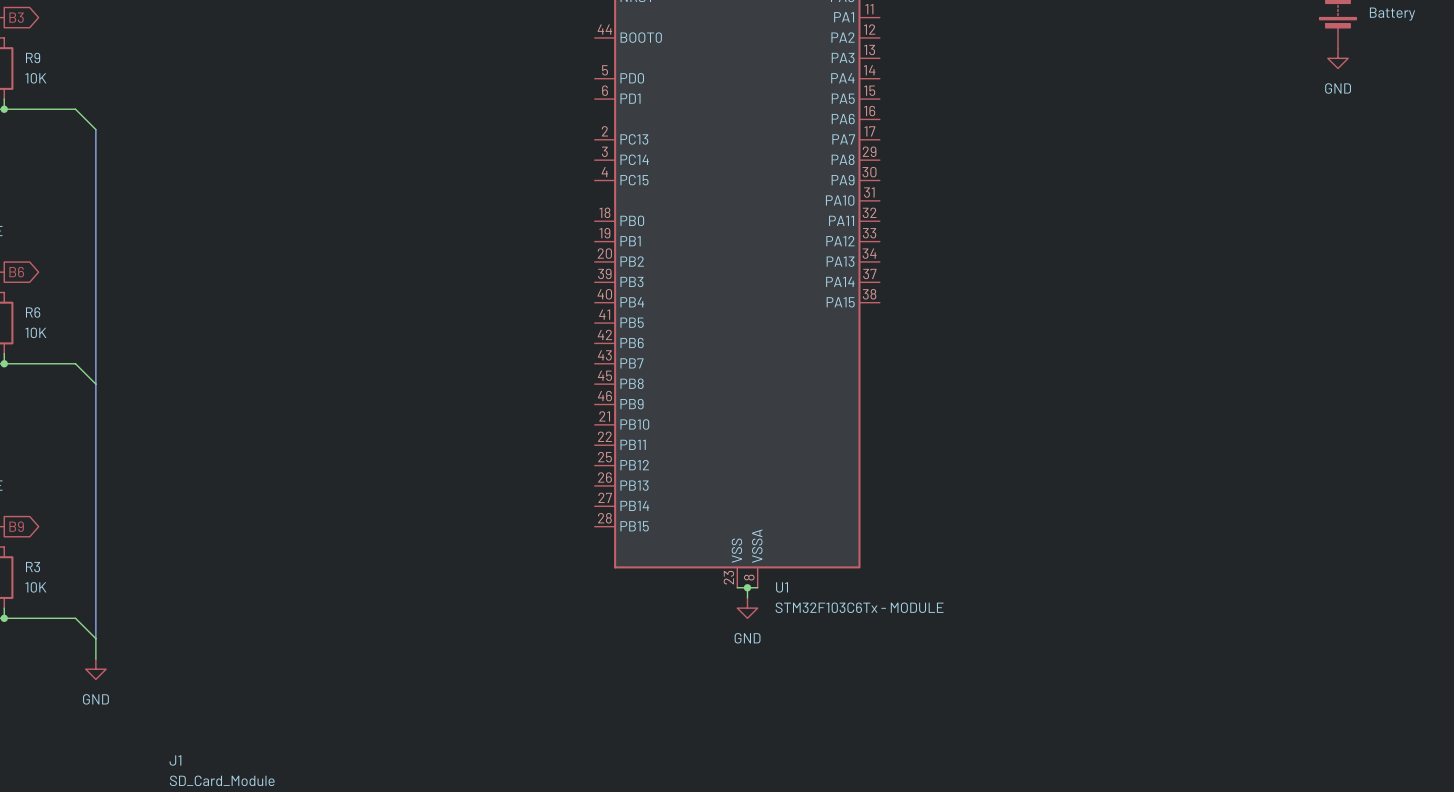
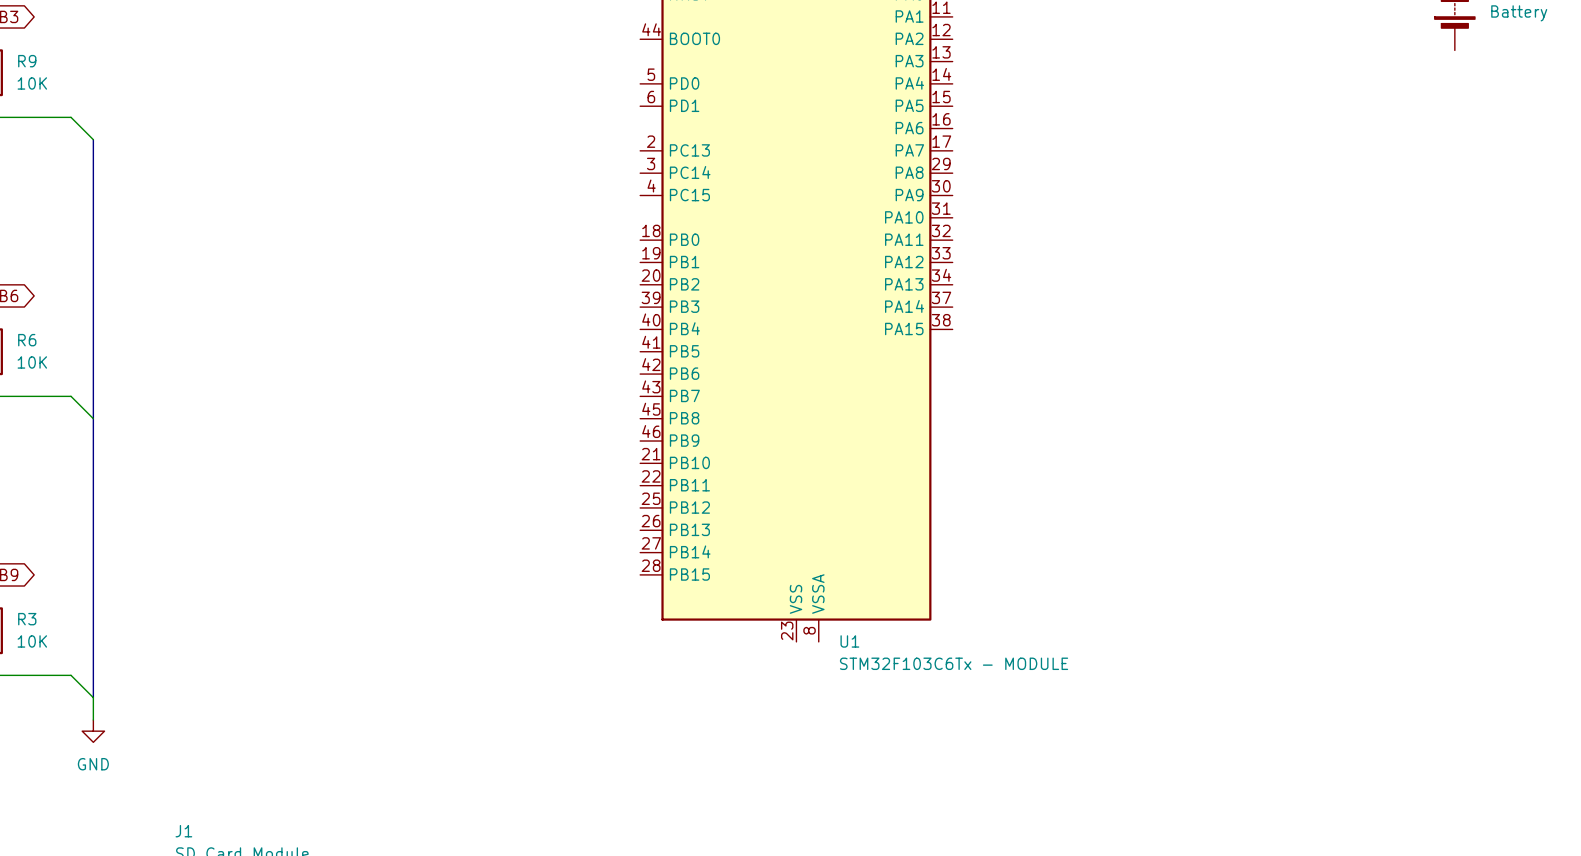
power symbol: GND (1337, 58) -> none
wire: (737, 587) (757, 587) -> none
wire: (747, 587) (747, 597) -> none
junction: (747, 587) -> none
power symbol: GND (747, 608) -> none

